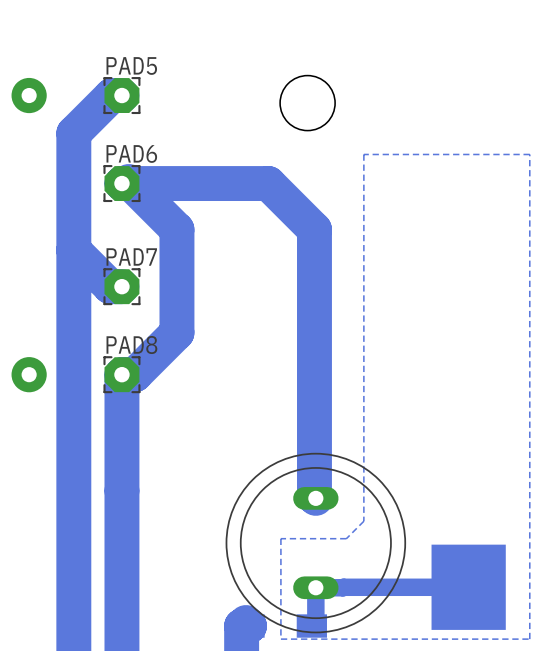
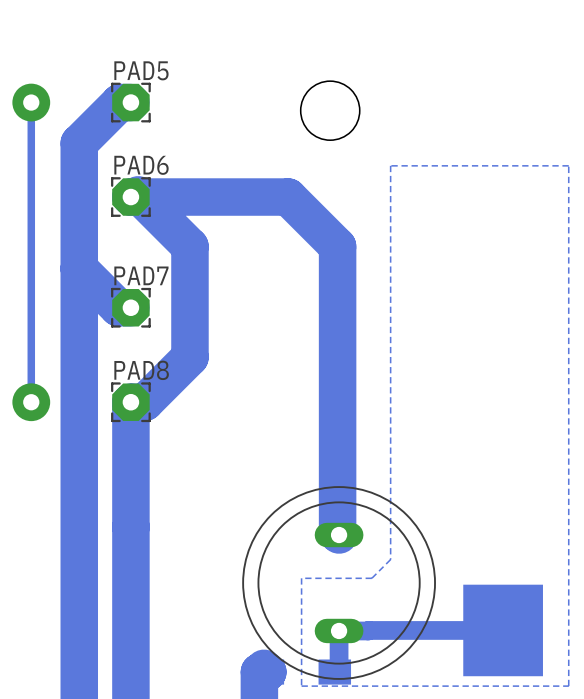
bottom track: none -> (31, 102) (31, 402)

